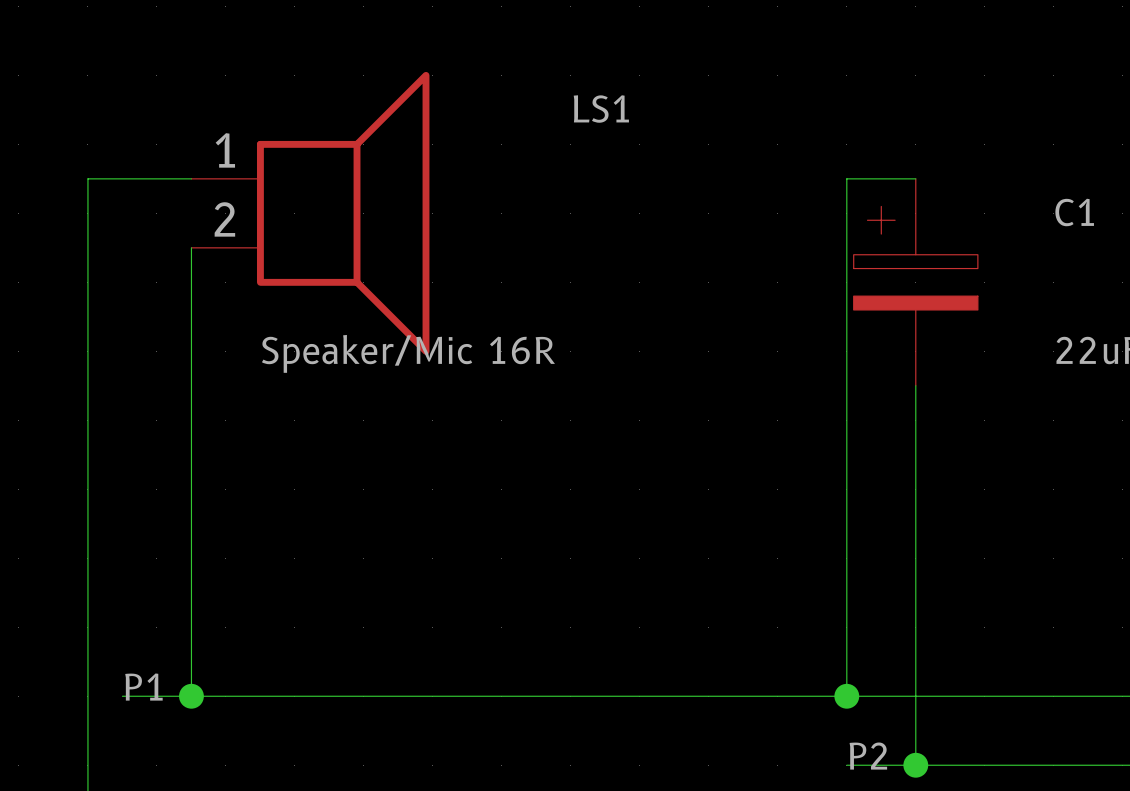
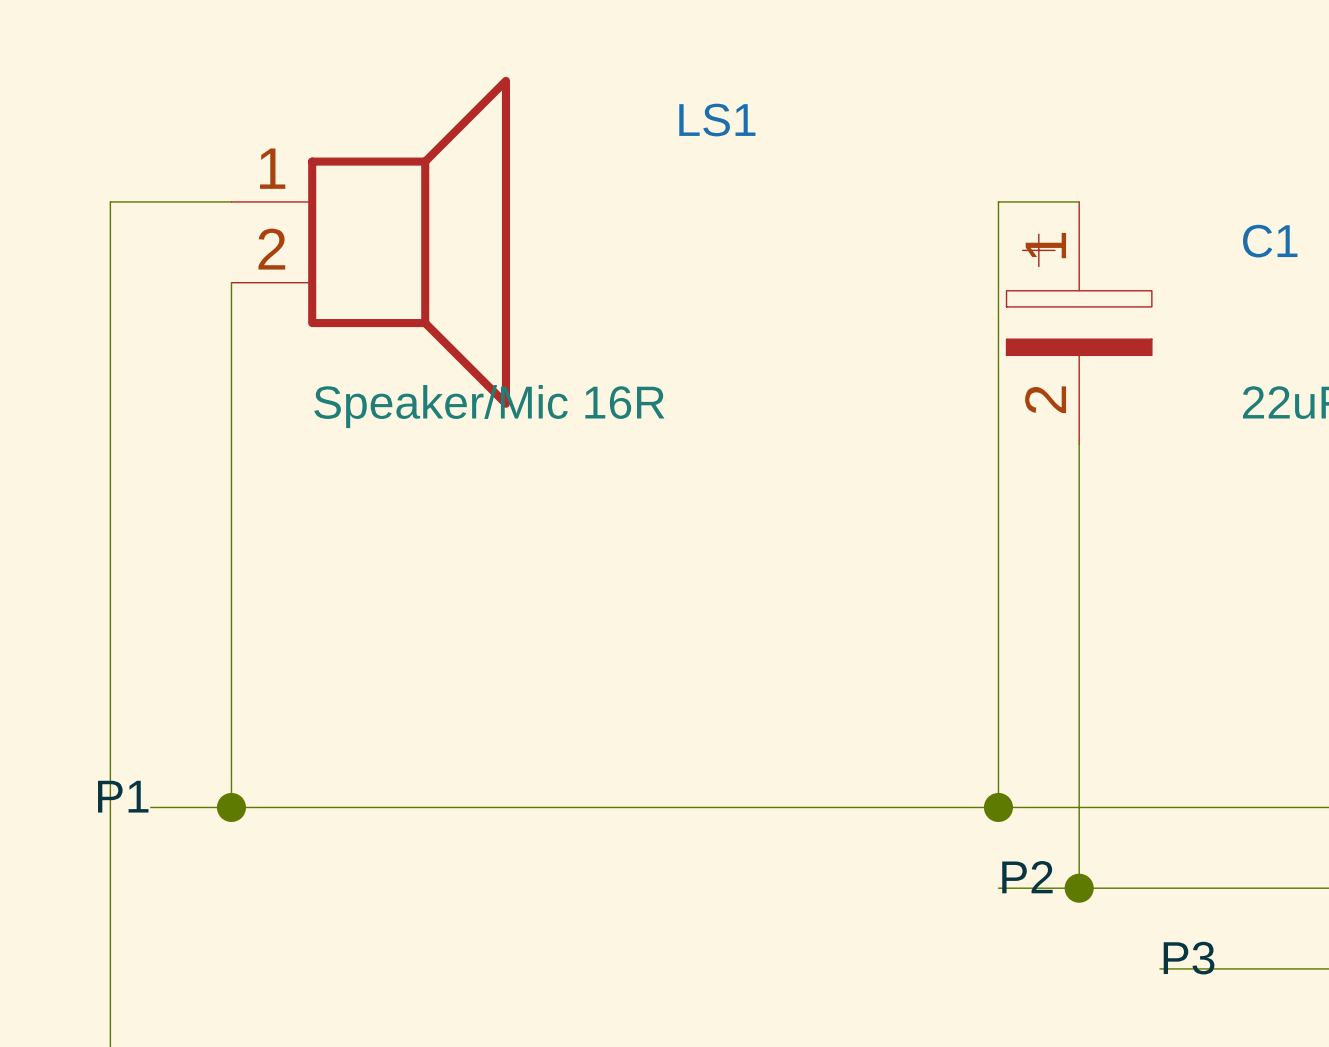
C1 pin number: none -> 1 (1045, 245)
C1 pin number: none -> 2 (1045, 399)
label position: P1 (143, 687) -> P1 (123, 796)

